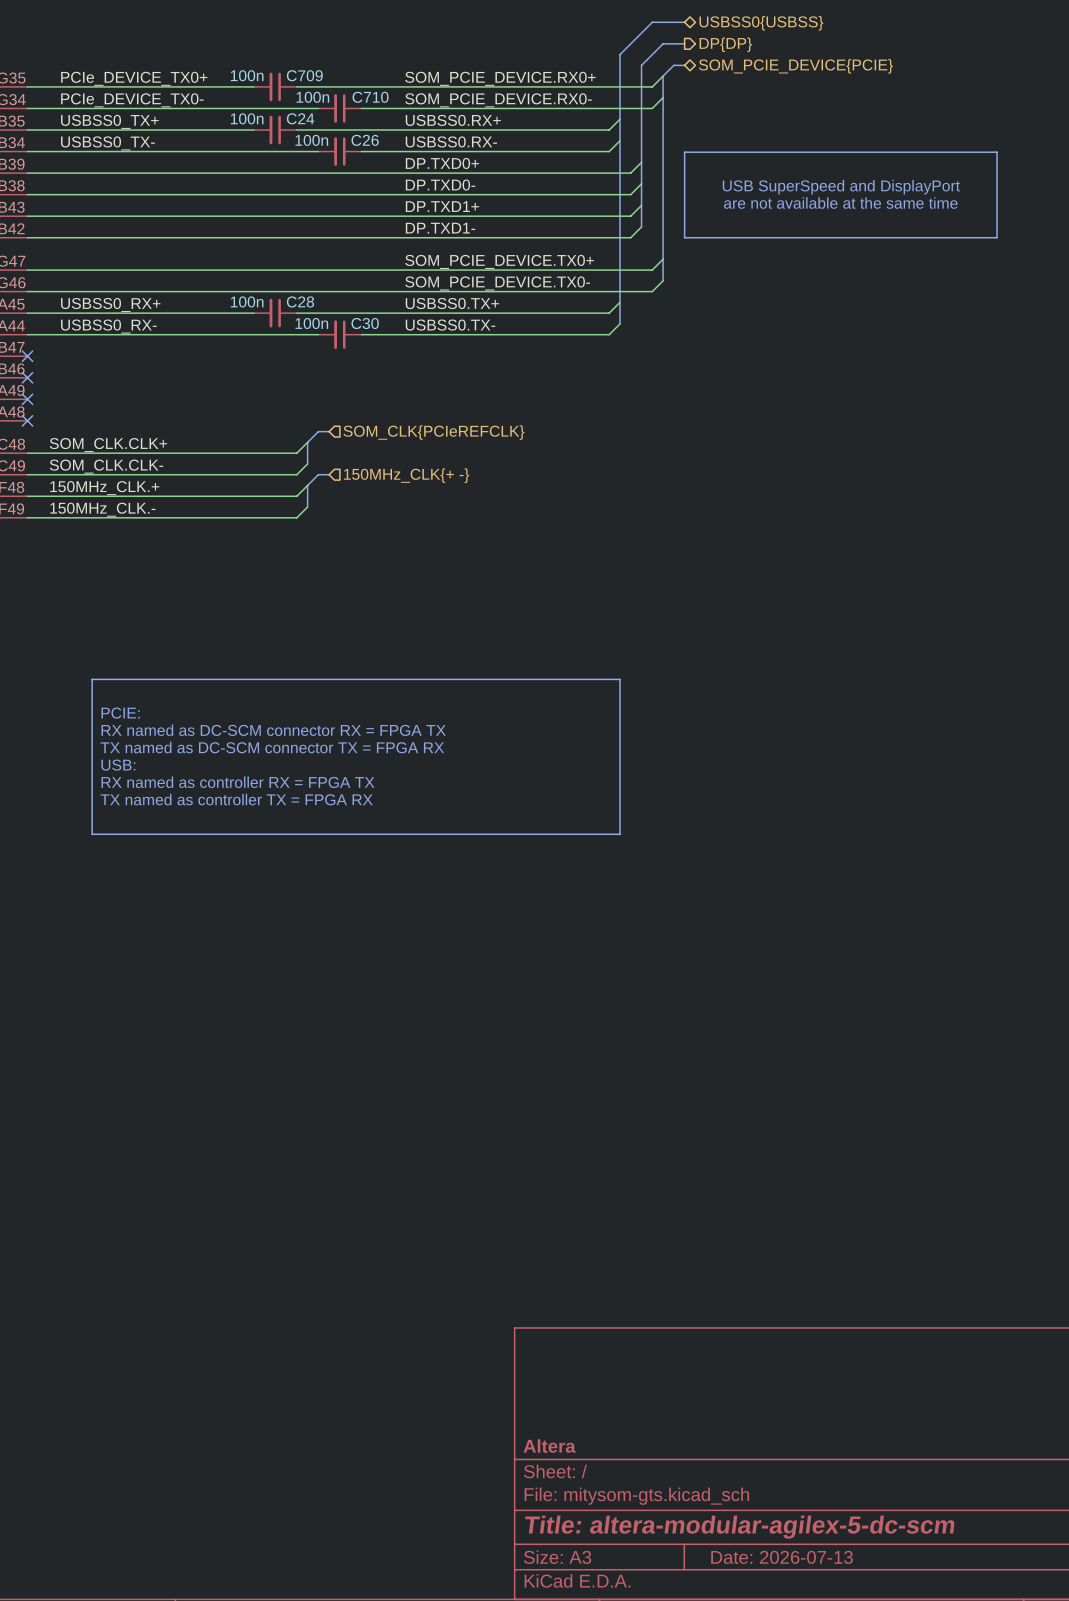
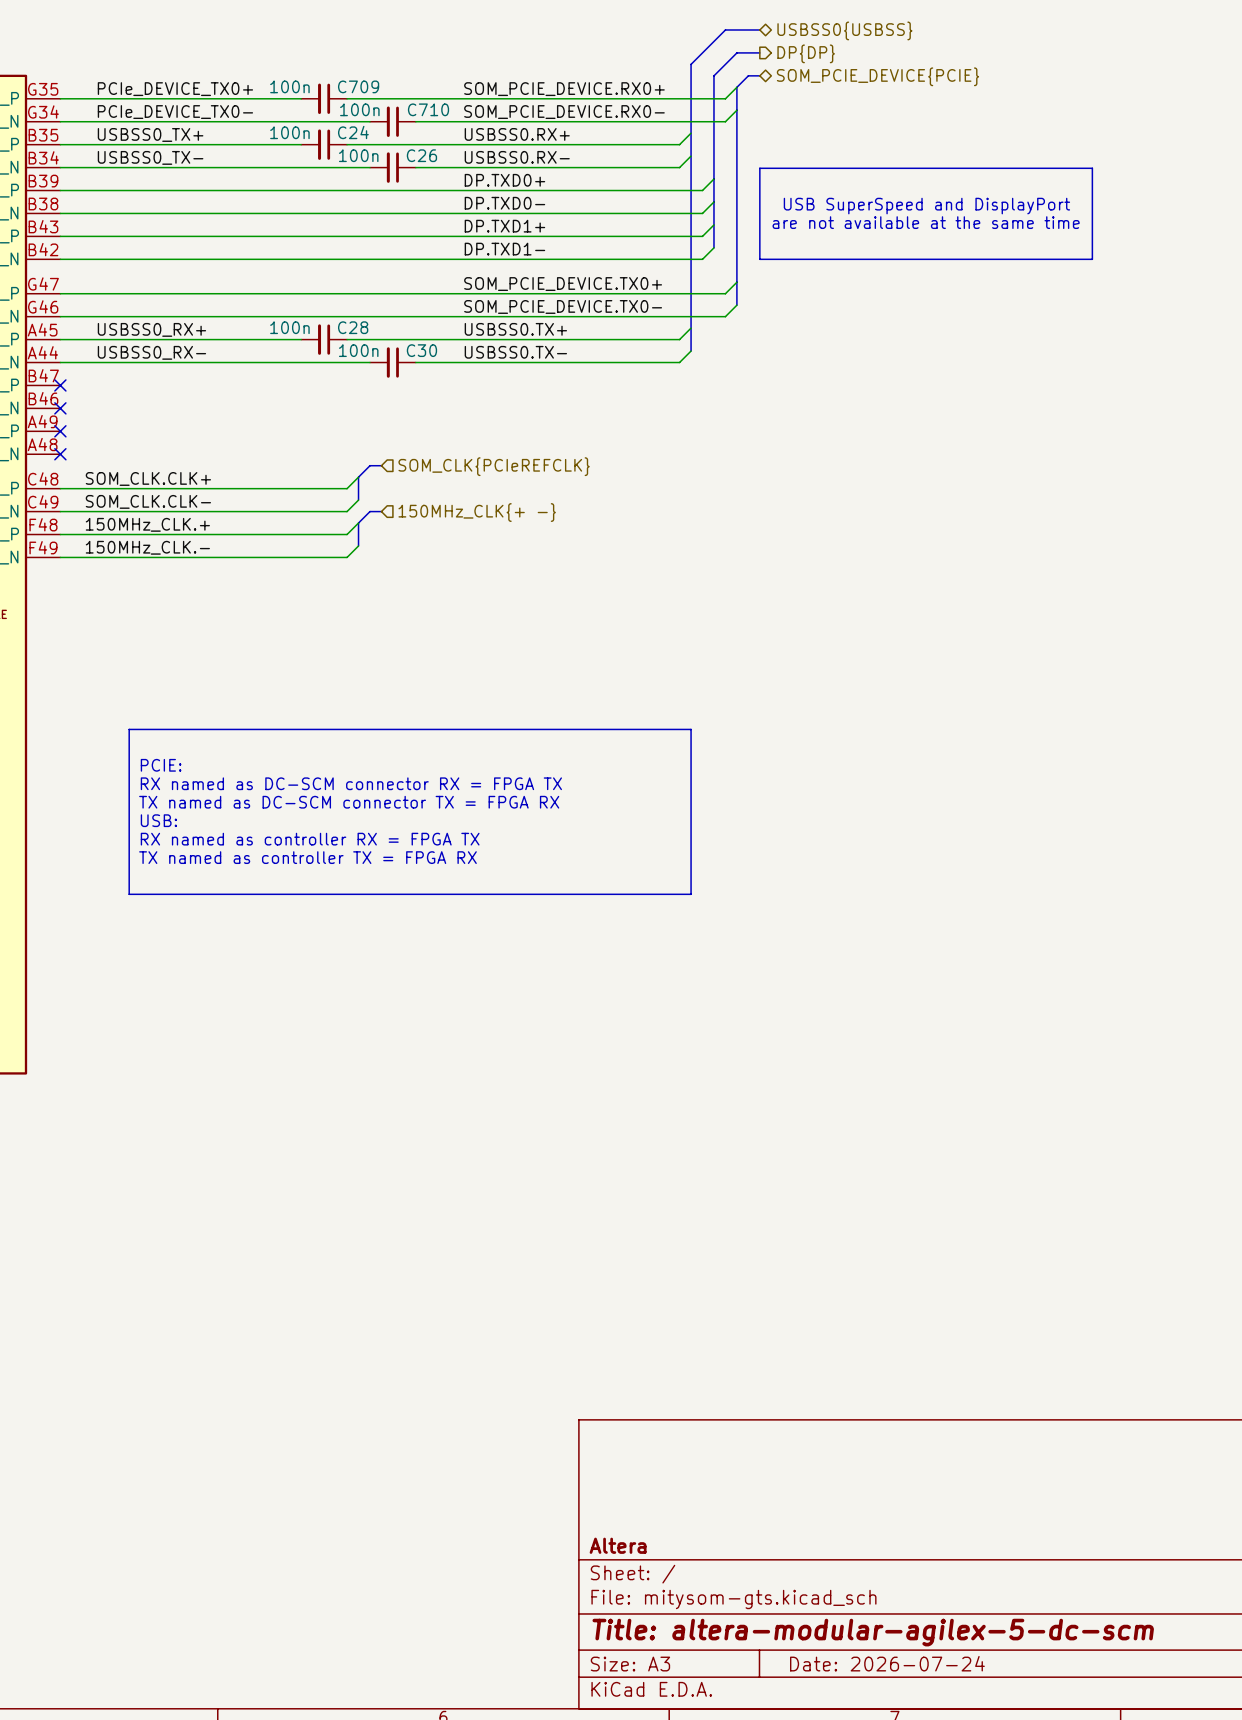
title block: Date: 2026-07-13 (782, 1557) -> Date: 2026-07-24 (887, 1663)

